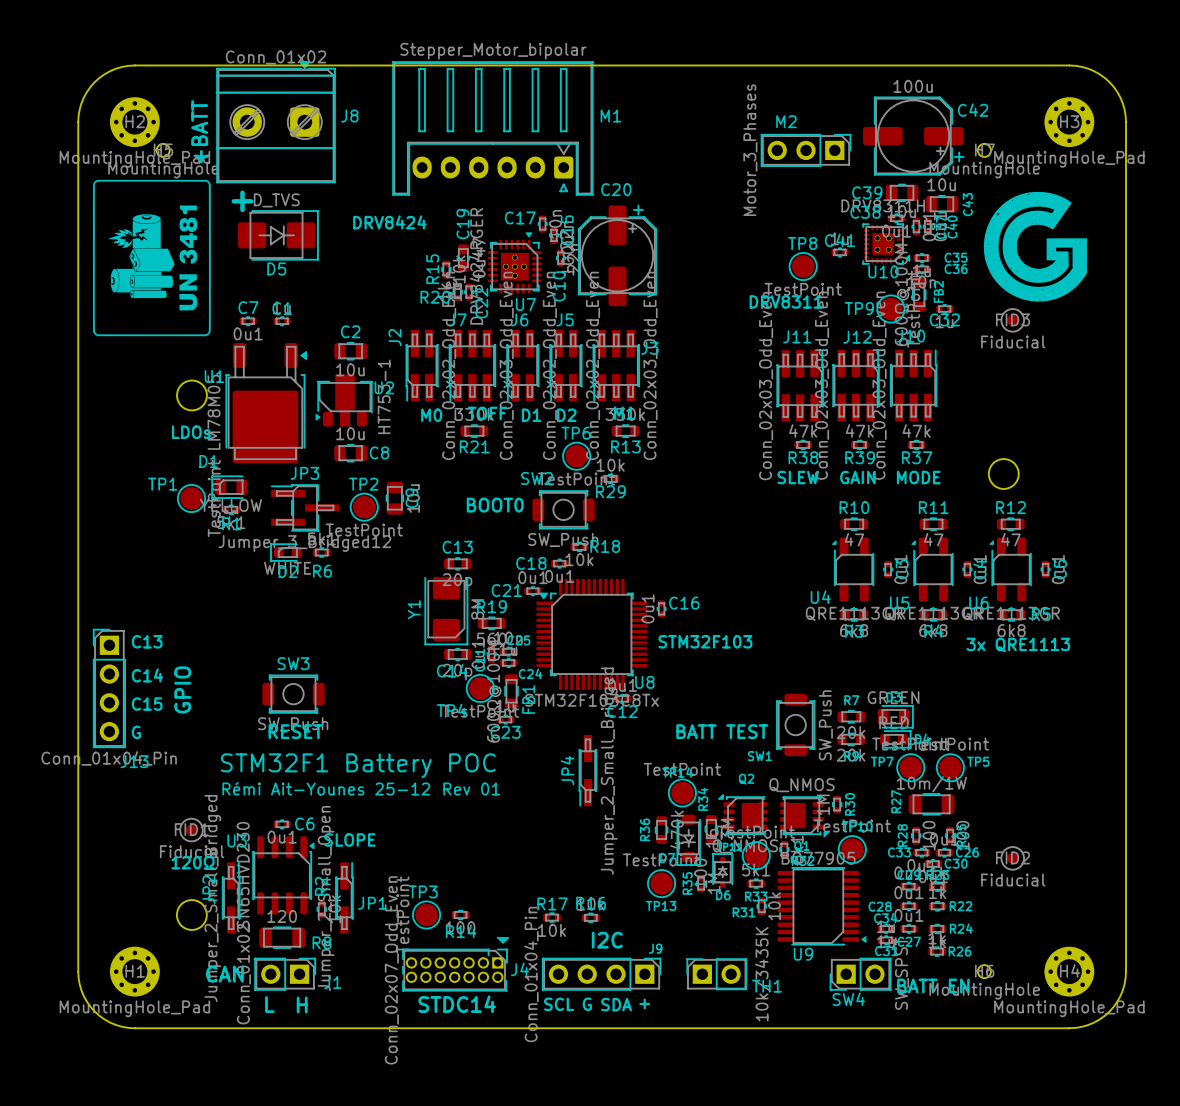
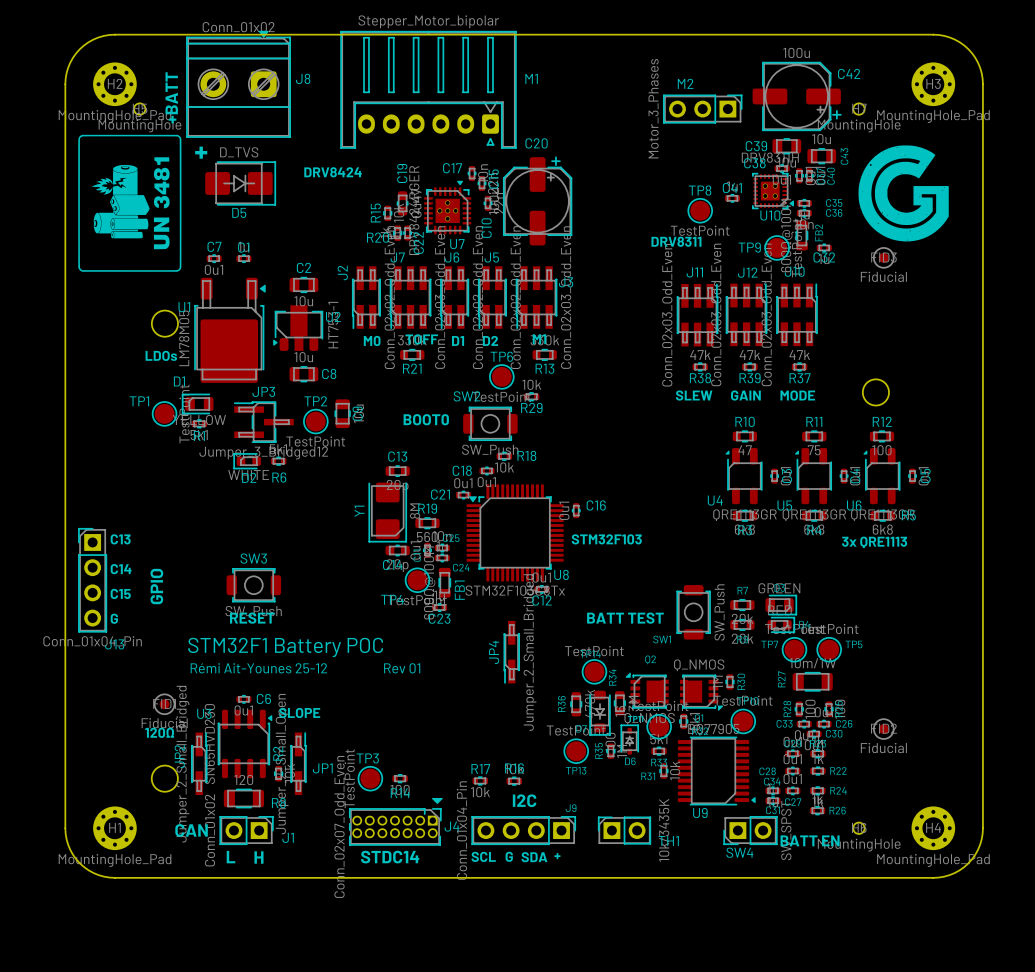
R11 value: 47 (933, 539) -> 75 (814, 450)
R12 value: 47 (1011, 539) -> 100 (881, 450)

